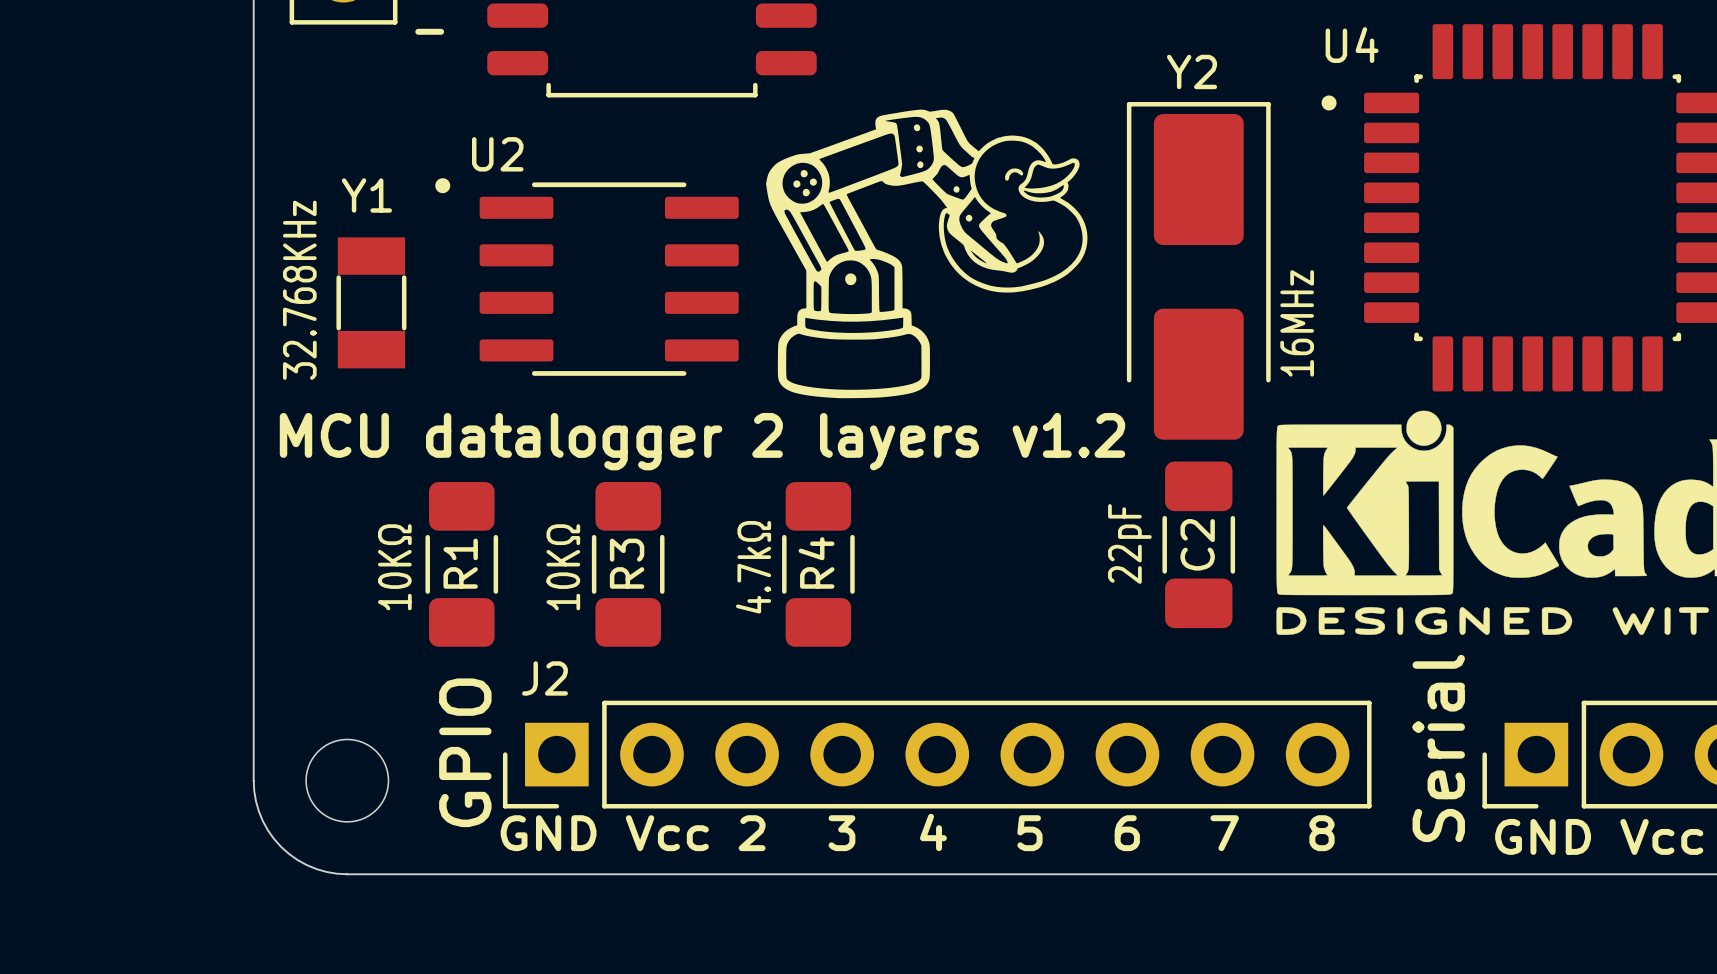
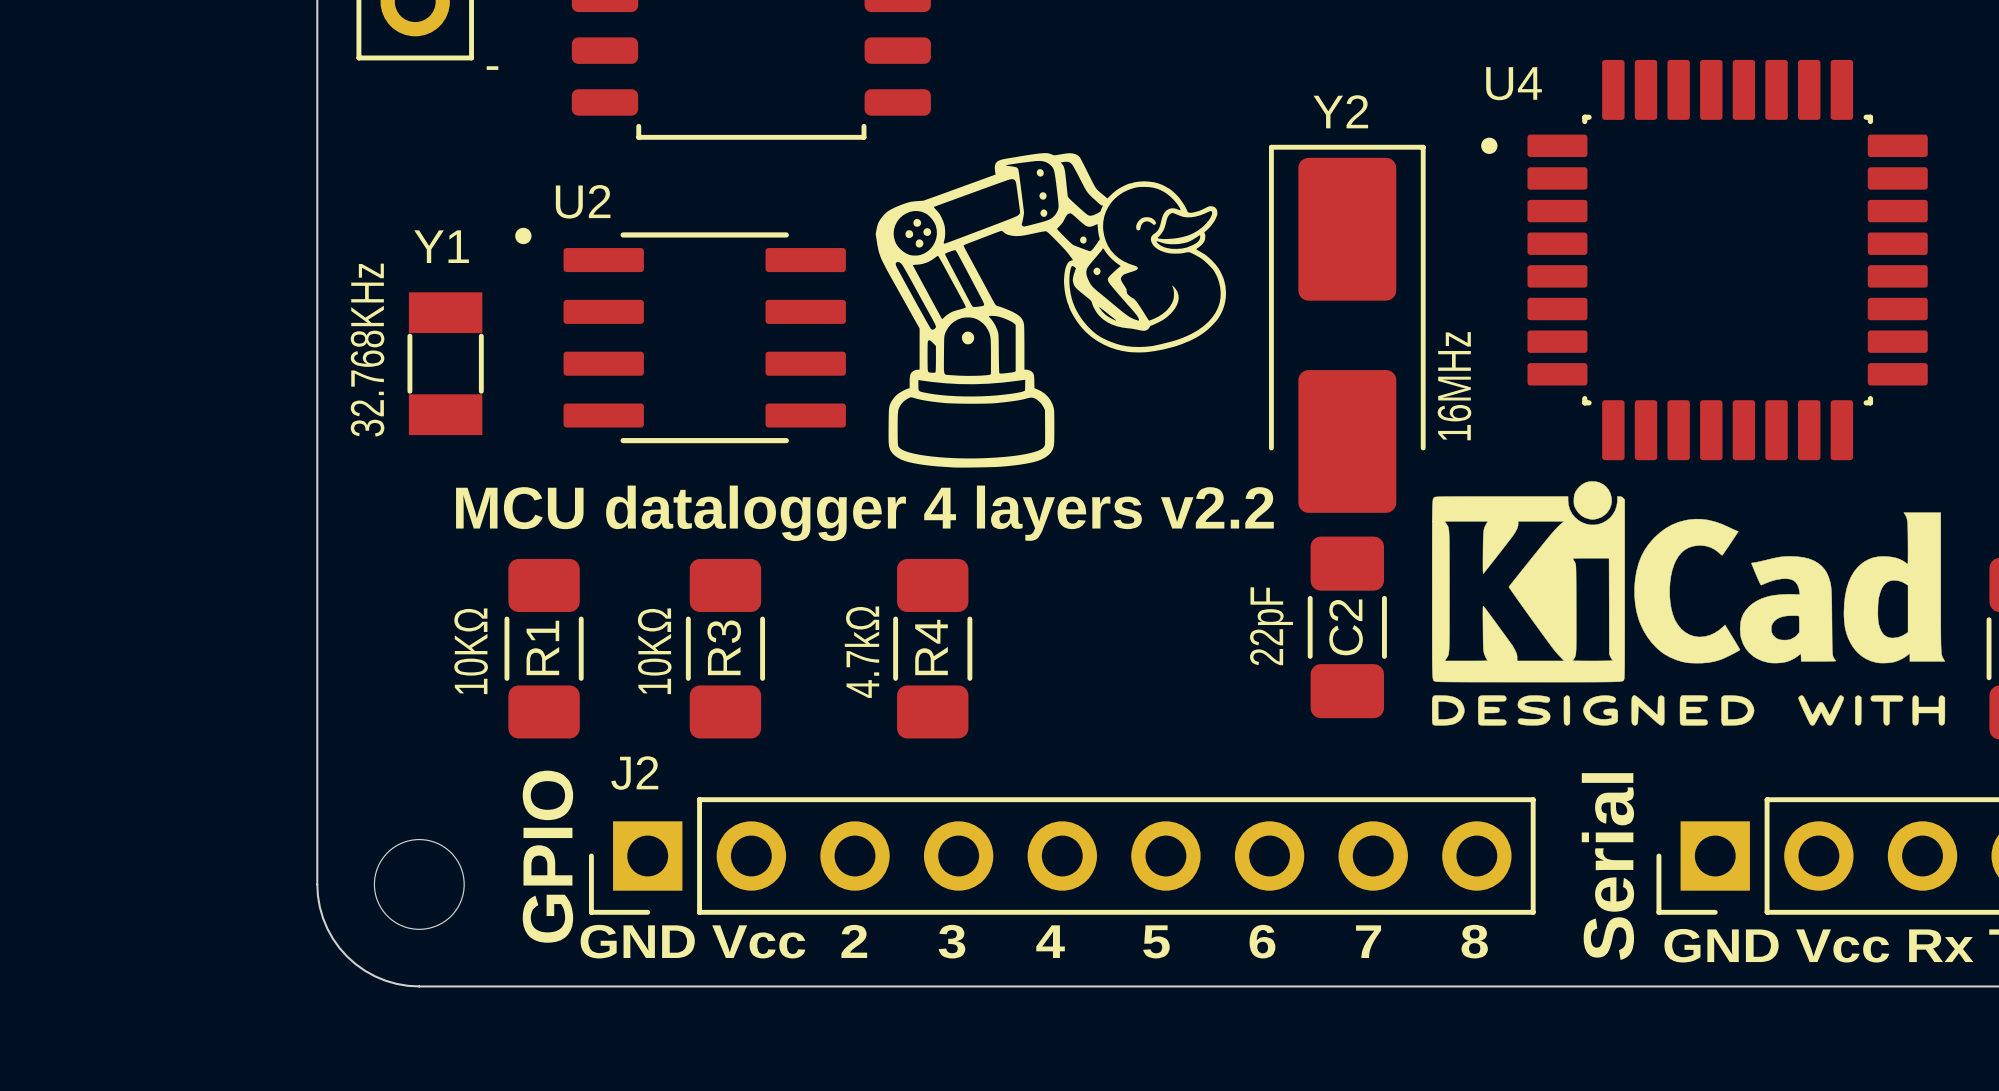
text: MCU datalogger 2 layers v1.2 (702, 441) -> MCU datalogger 4 layers v2.2 (864, 513)

